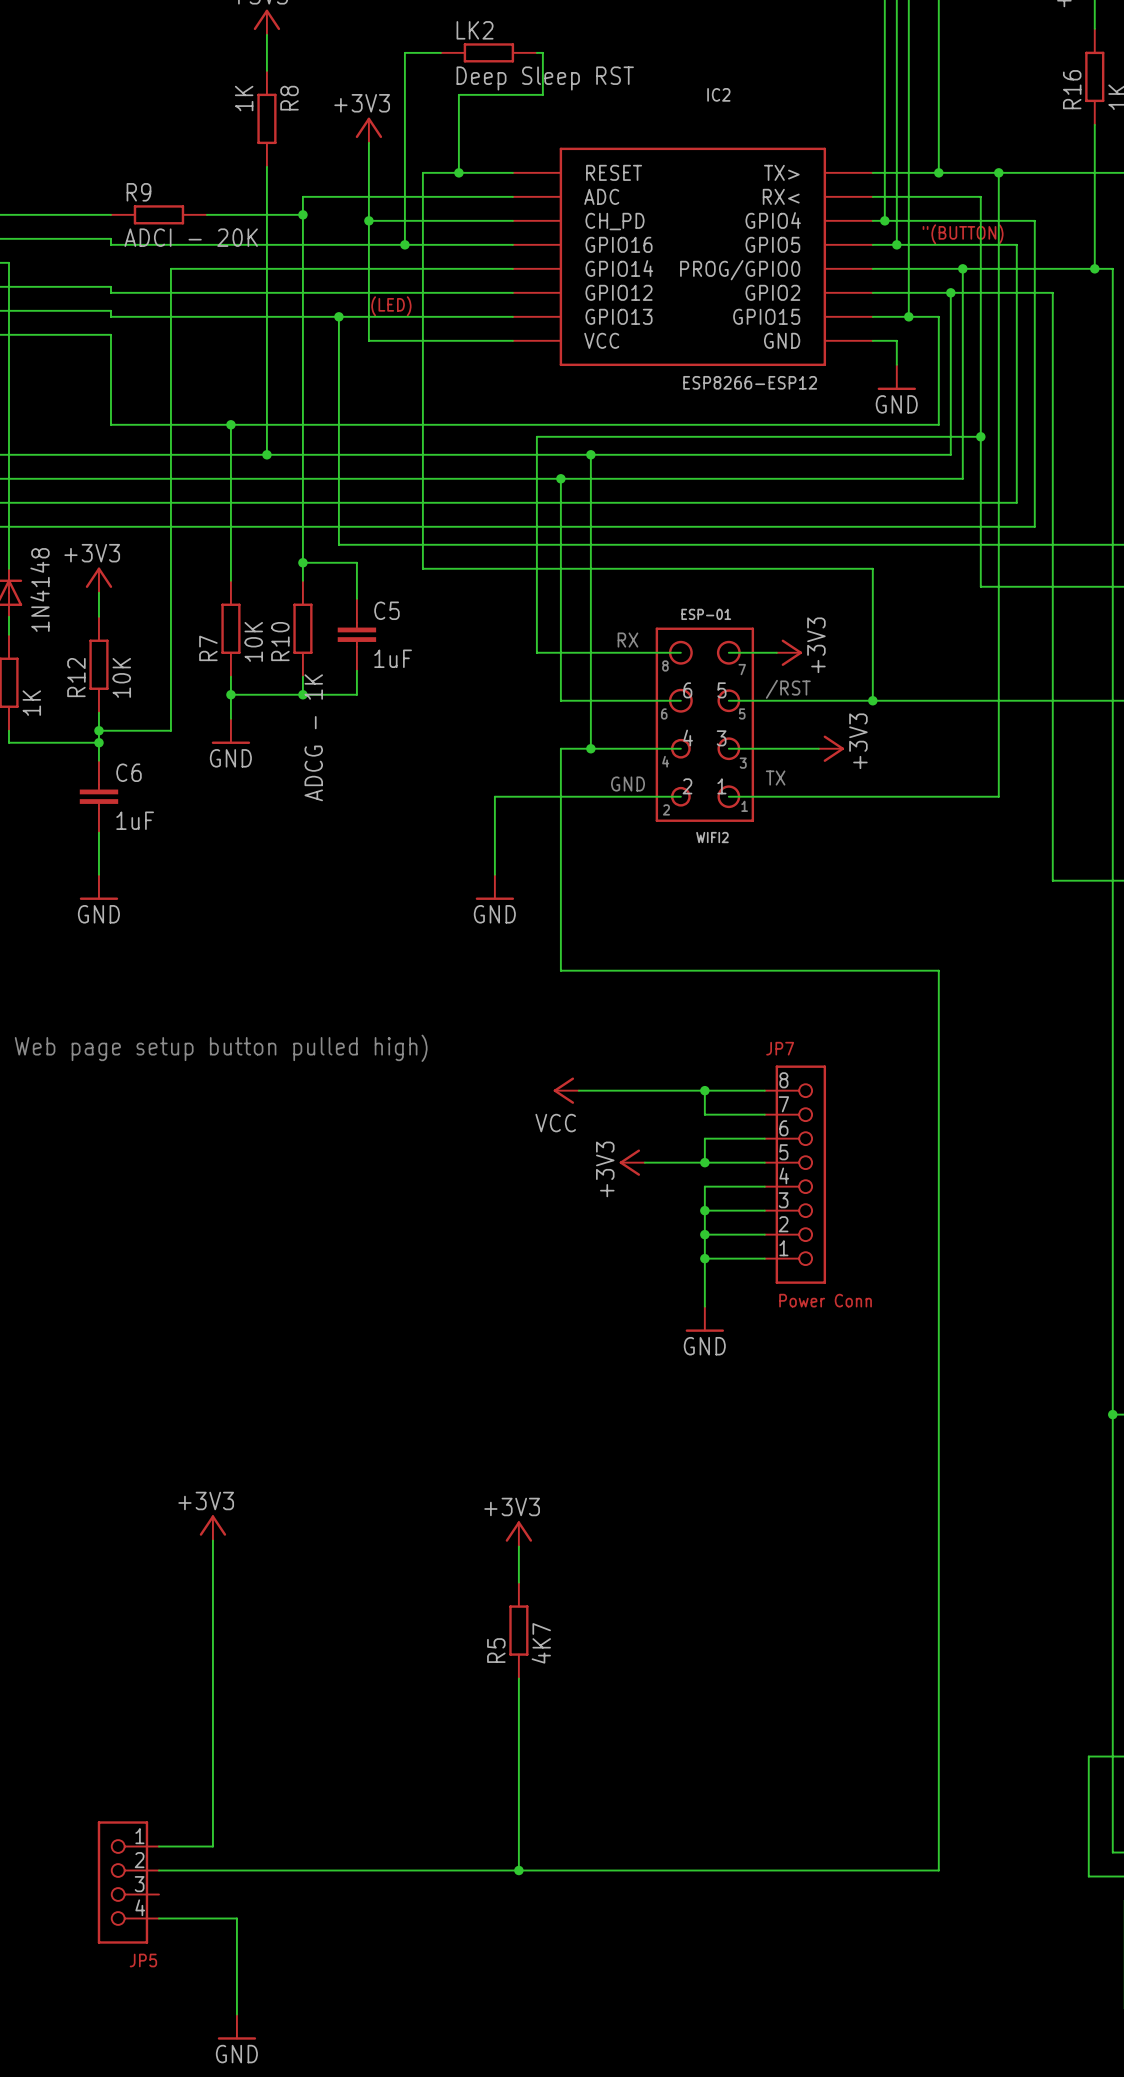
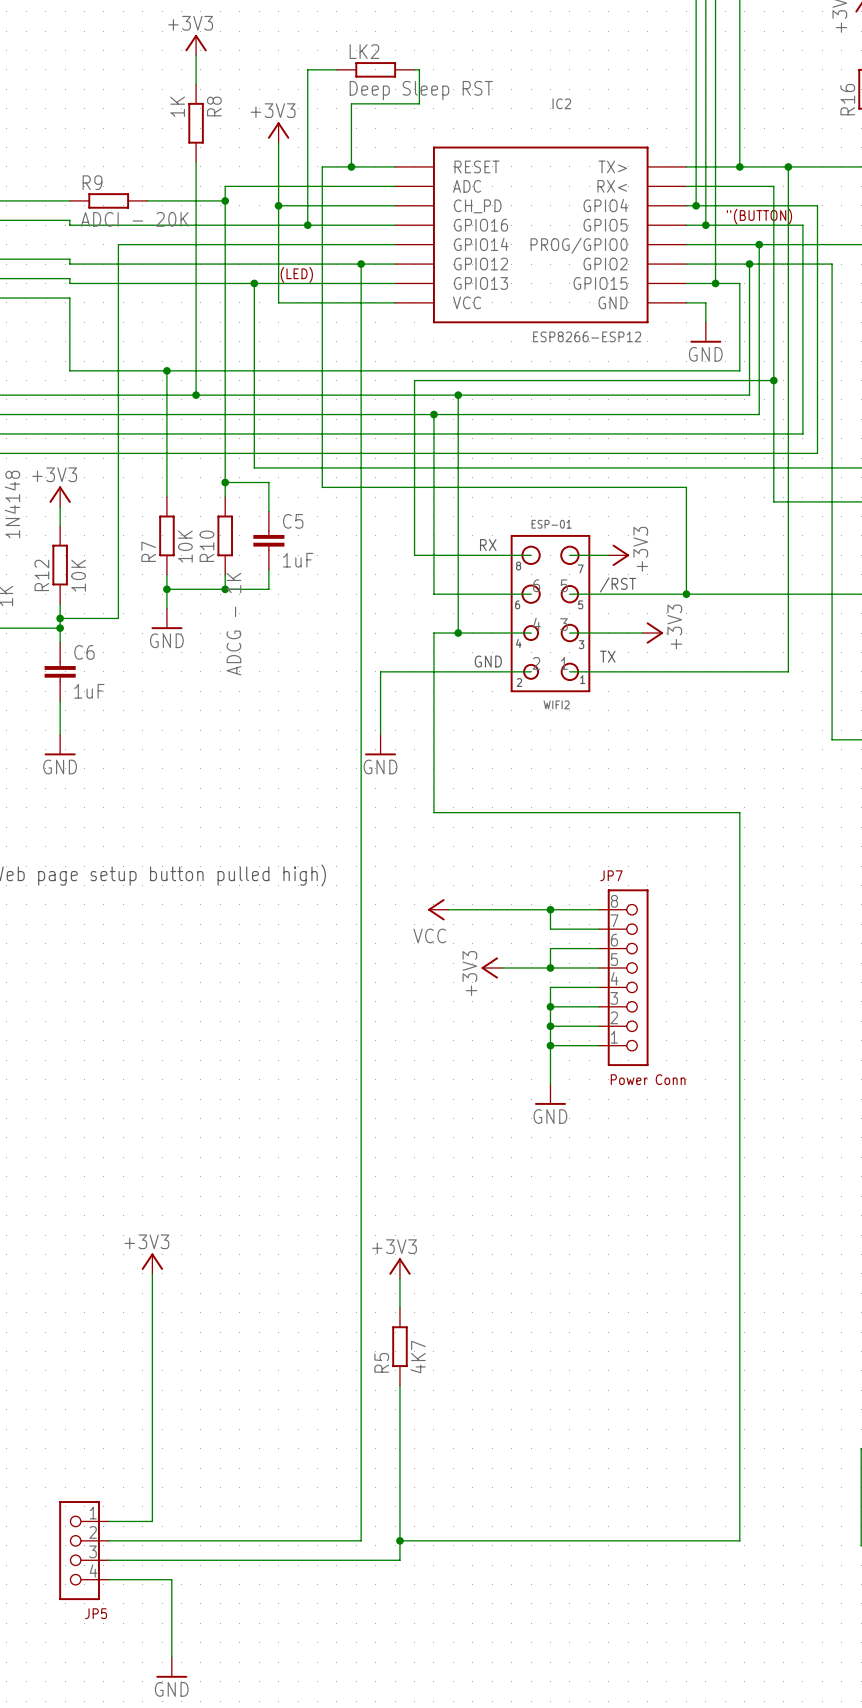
wire: none -> (361, 264) (361, 1540)
junction: none -> (361, 264)
wire: (470, 1870) (518, 1870) -> (108, 1560) (399, 1560) (399, 1540)

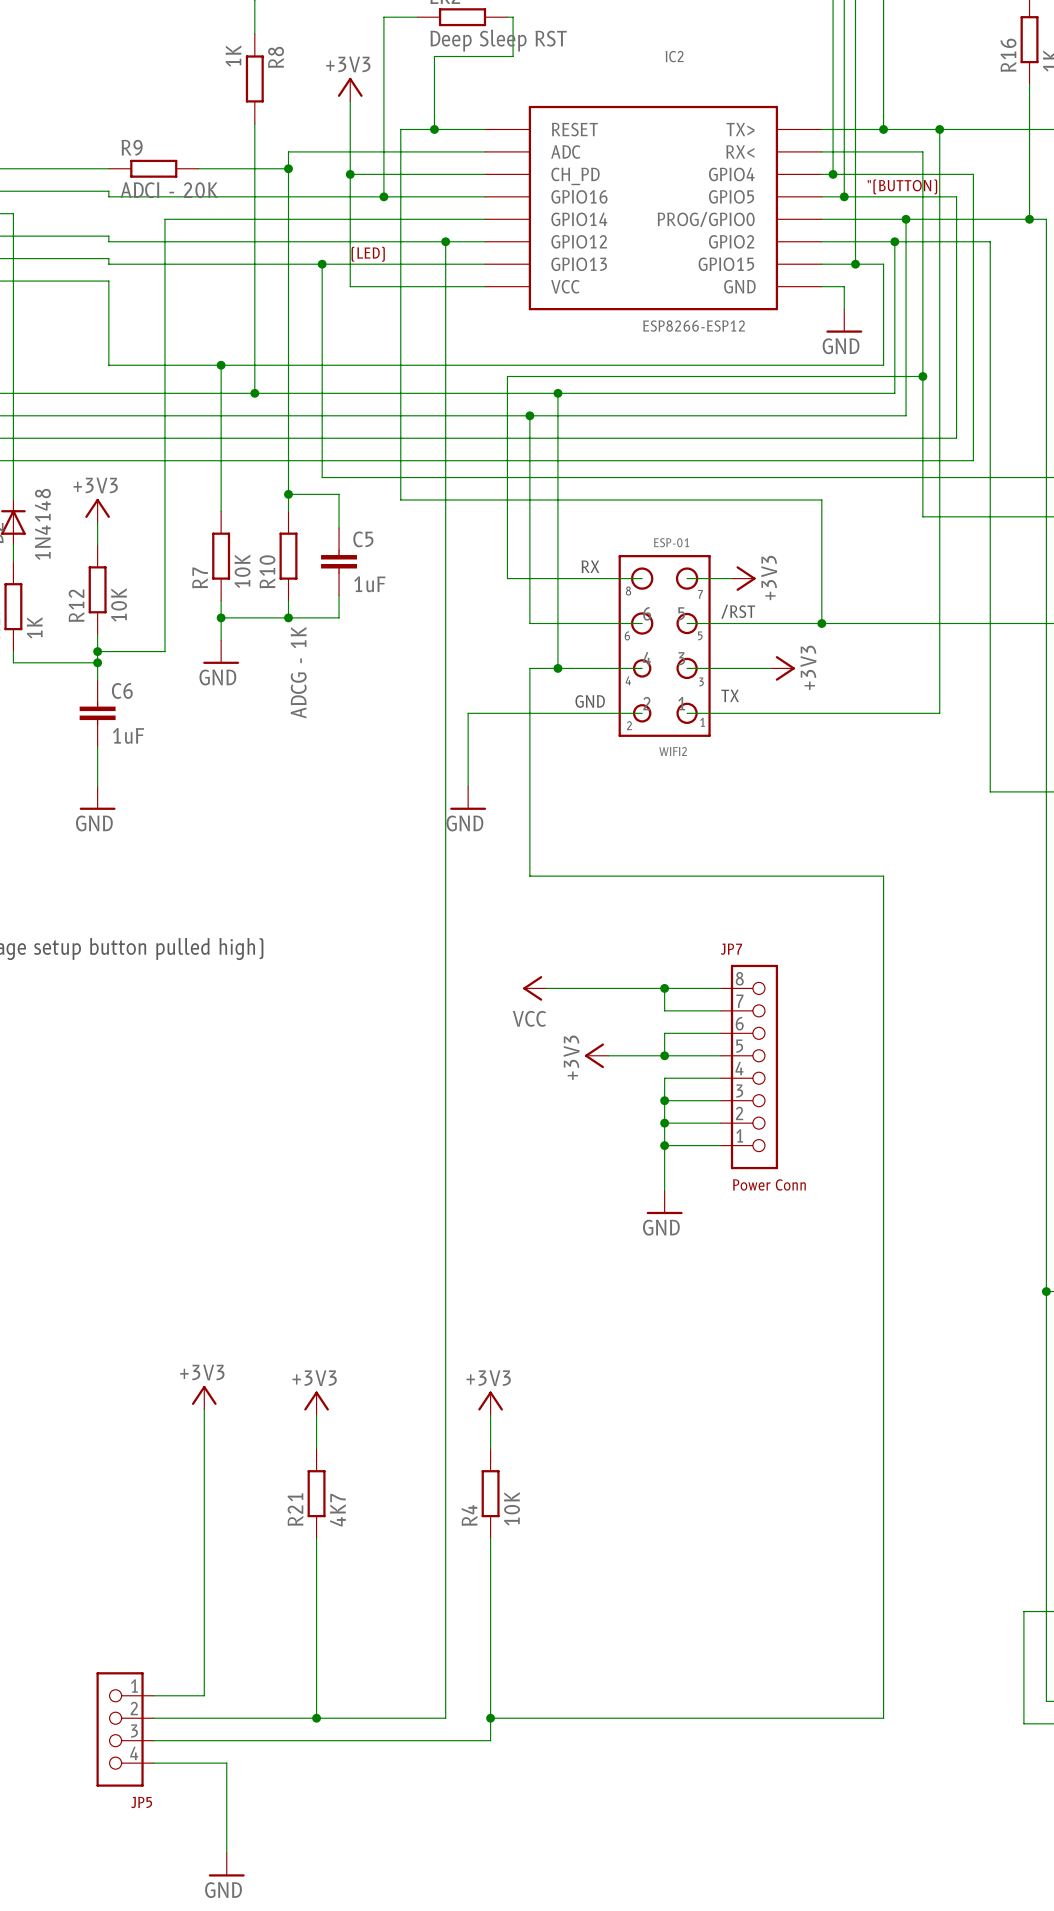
power symbol: none -> +3V3 (316, 1403)
wire: none -> (316, 1415) (316, 1448)
R21: none -> 4K7 (316, 1493)
R5 value: 4K7 (418, 1357) -> 10K (512, 1508)
R5 name: R5 (381, 1362) -> R4 (469, 1515)
wire: none -> (316, 1538) (316, 1718)
junction: none -> (316, 1718)

